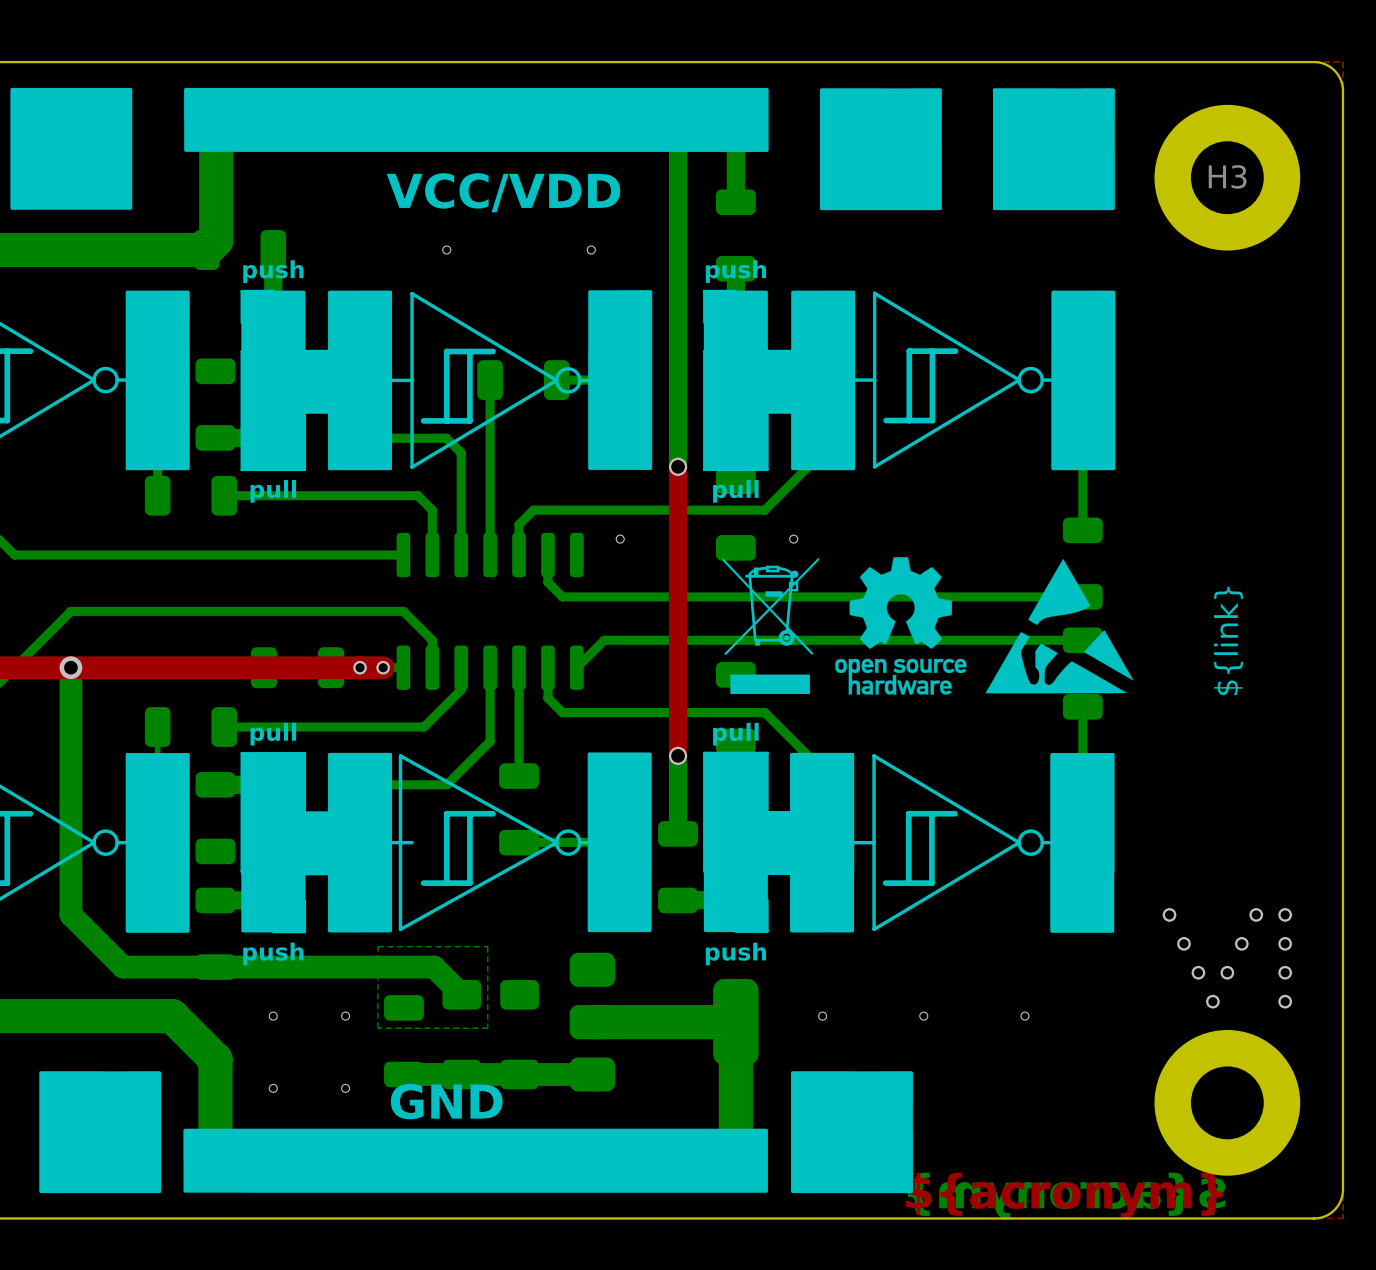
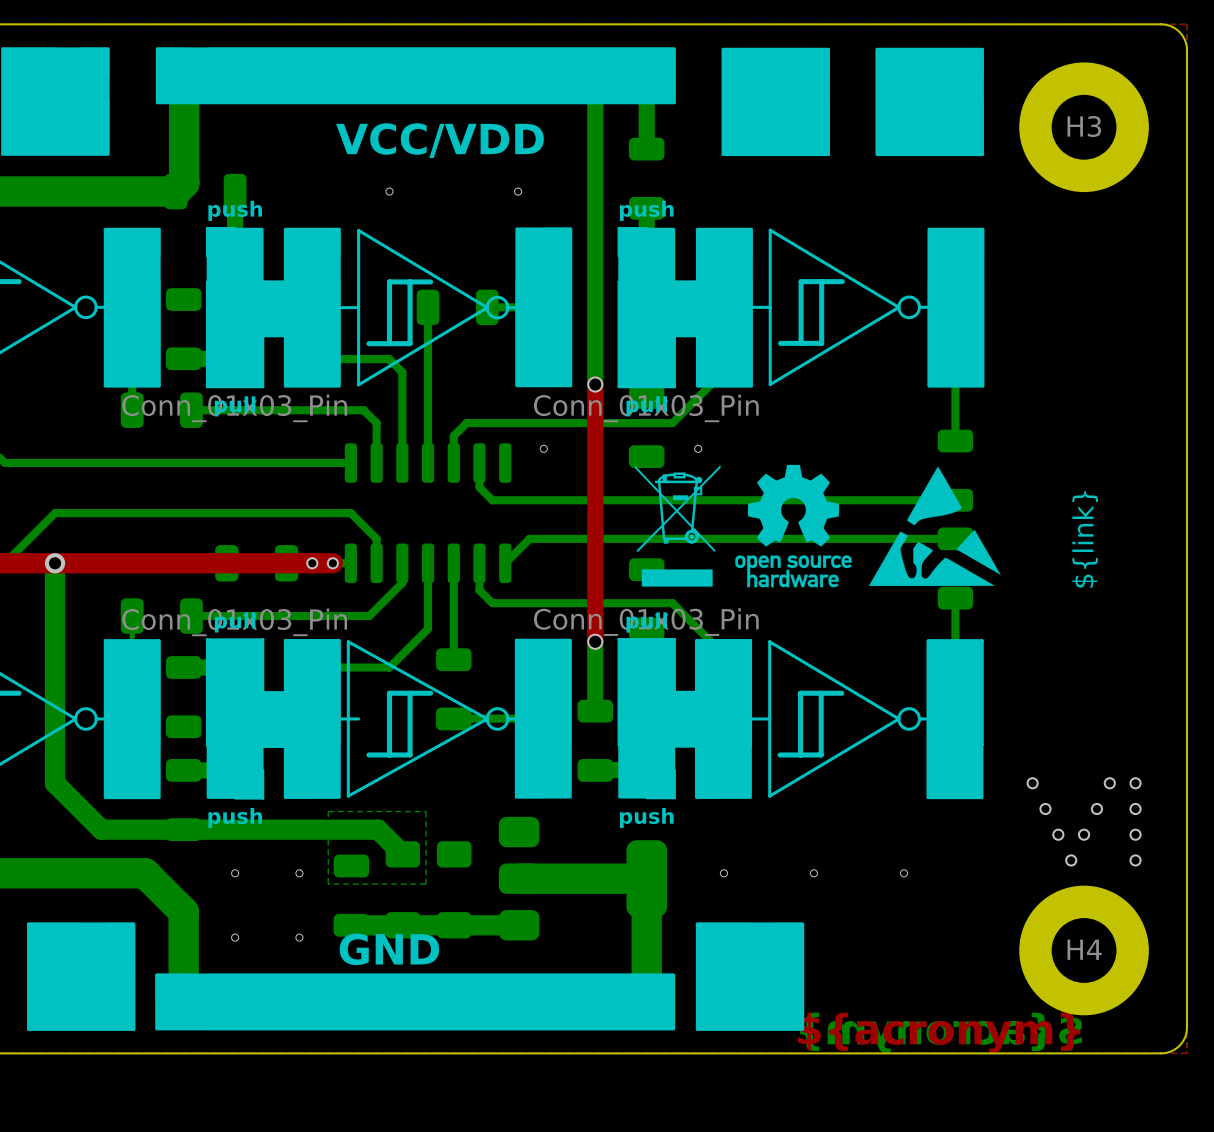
part value: none -> Conn_01x03_Pin (234, 408)
part value: none -> Conn_01x03_Pin (646, 408)
part value: none -> Conn_01x03_Pin (646, 622)
part value: none -> Conn_01x03_Pin (234, 622)
H4 name: none -> H4 (1084, 949)

